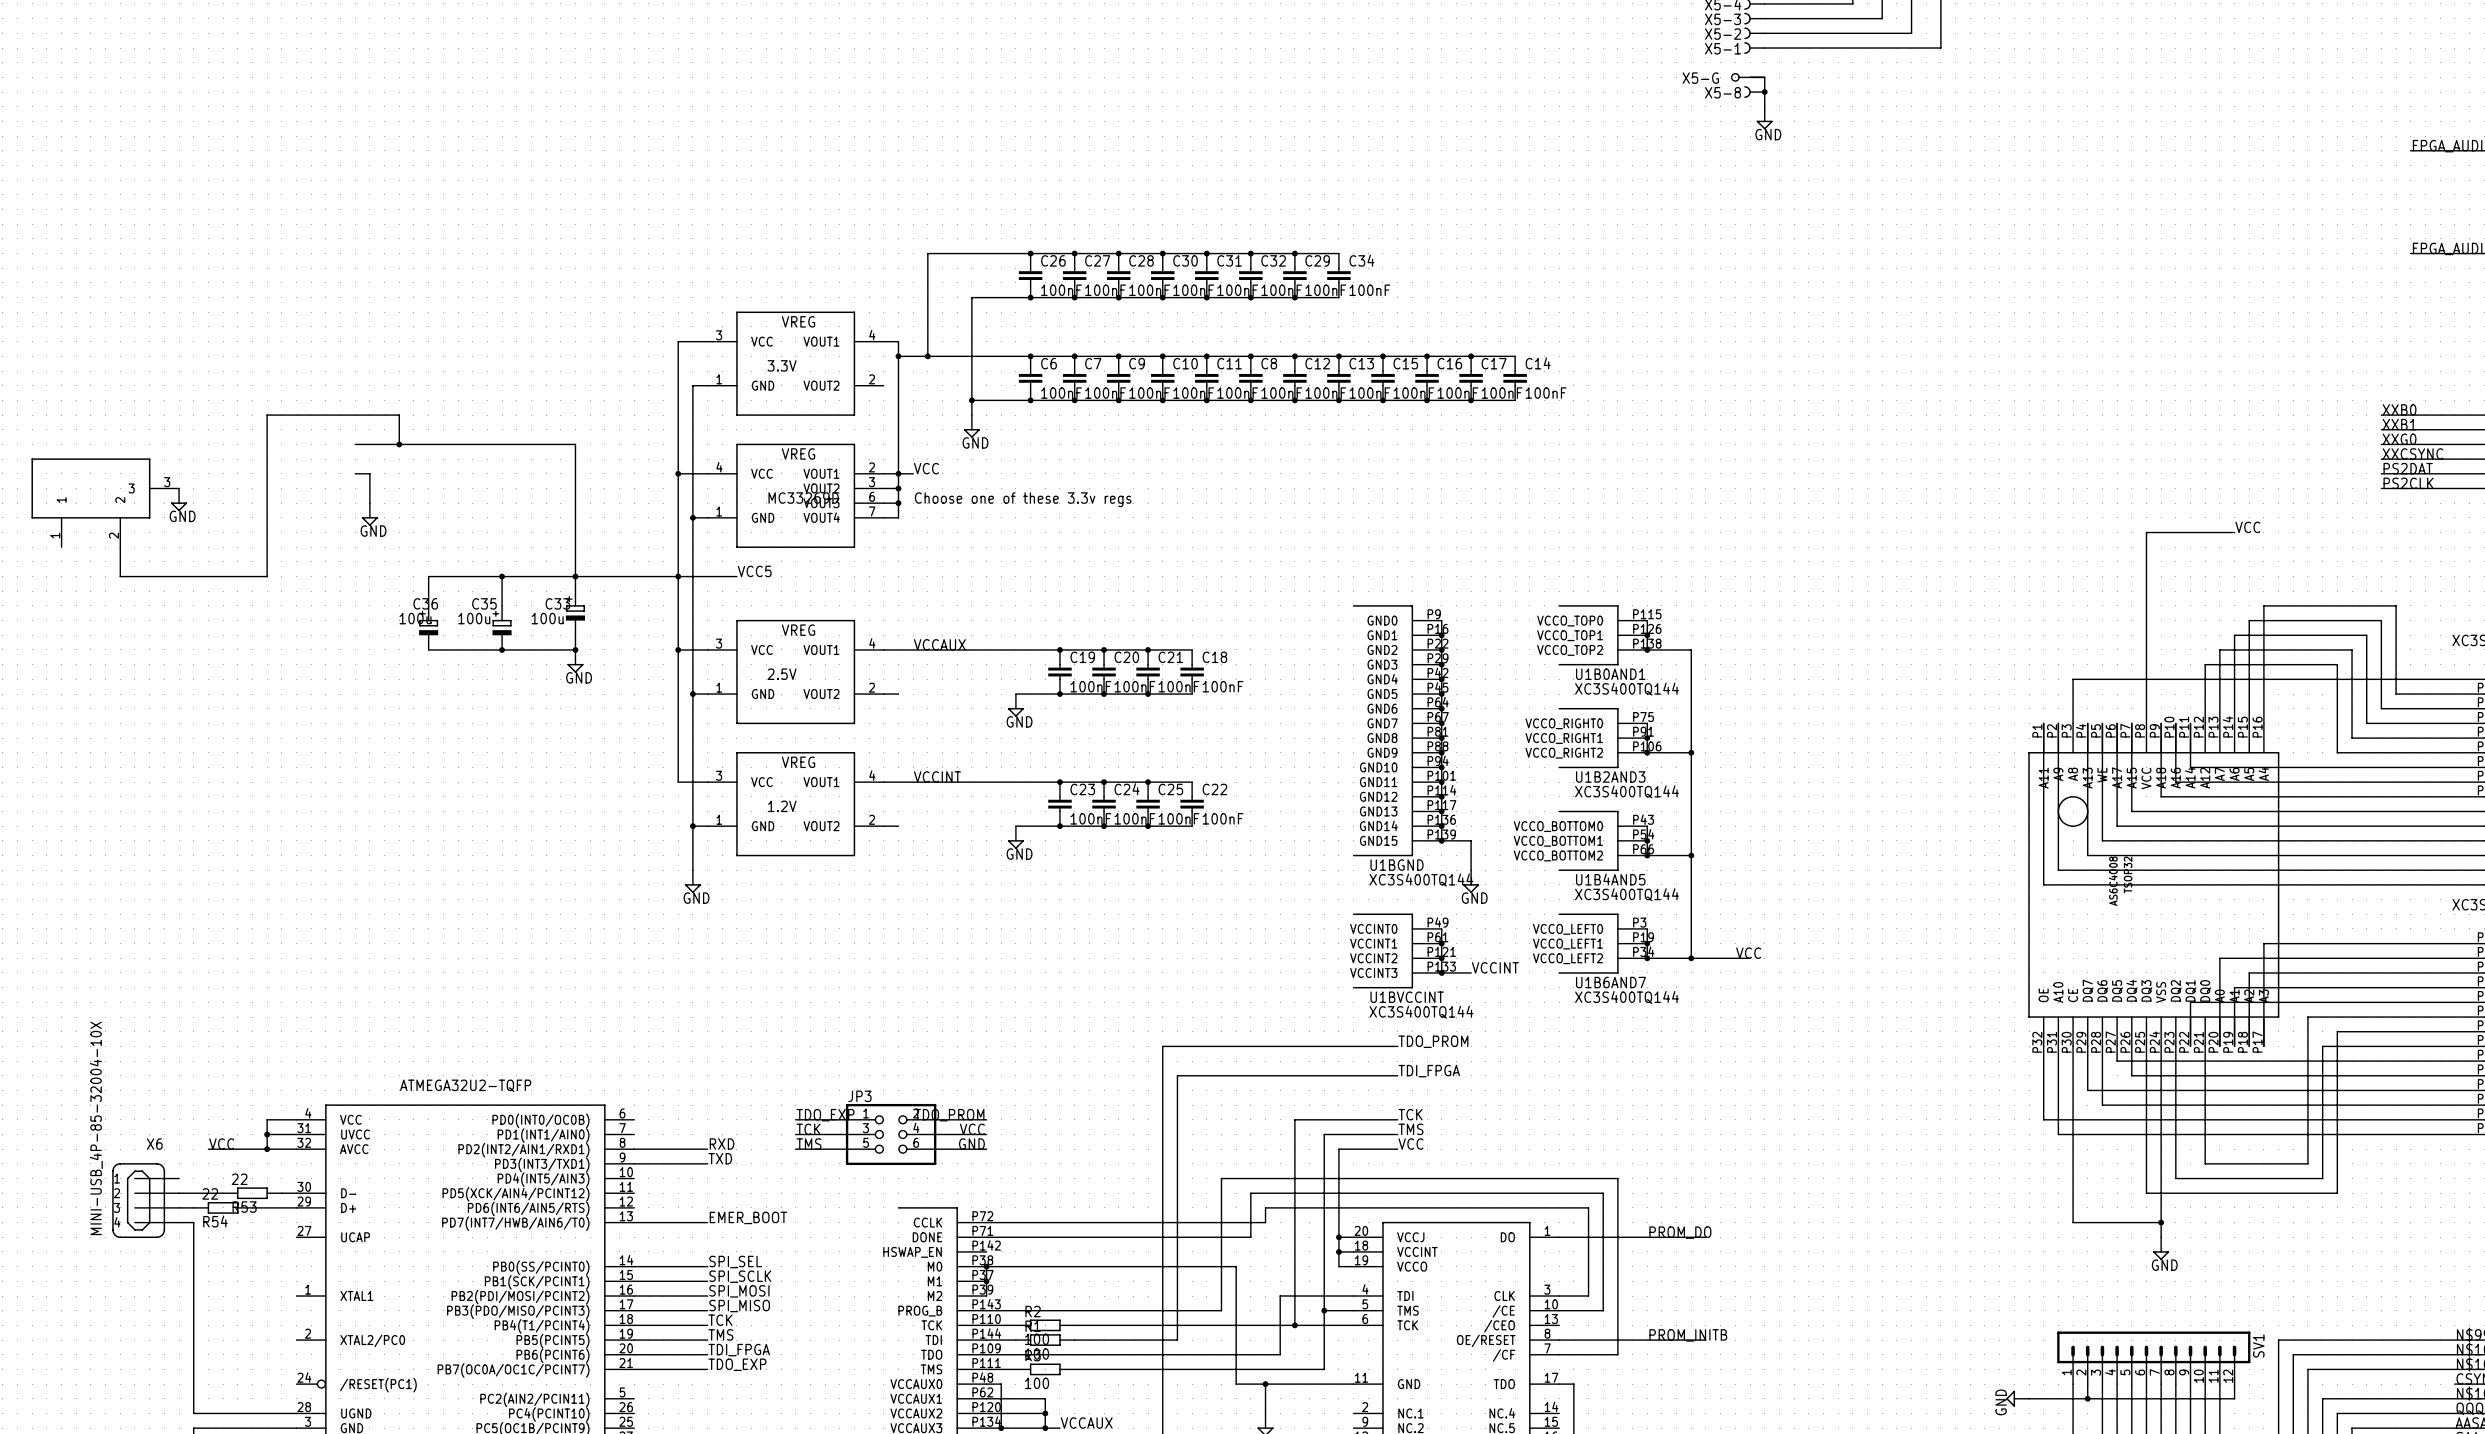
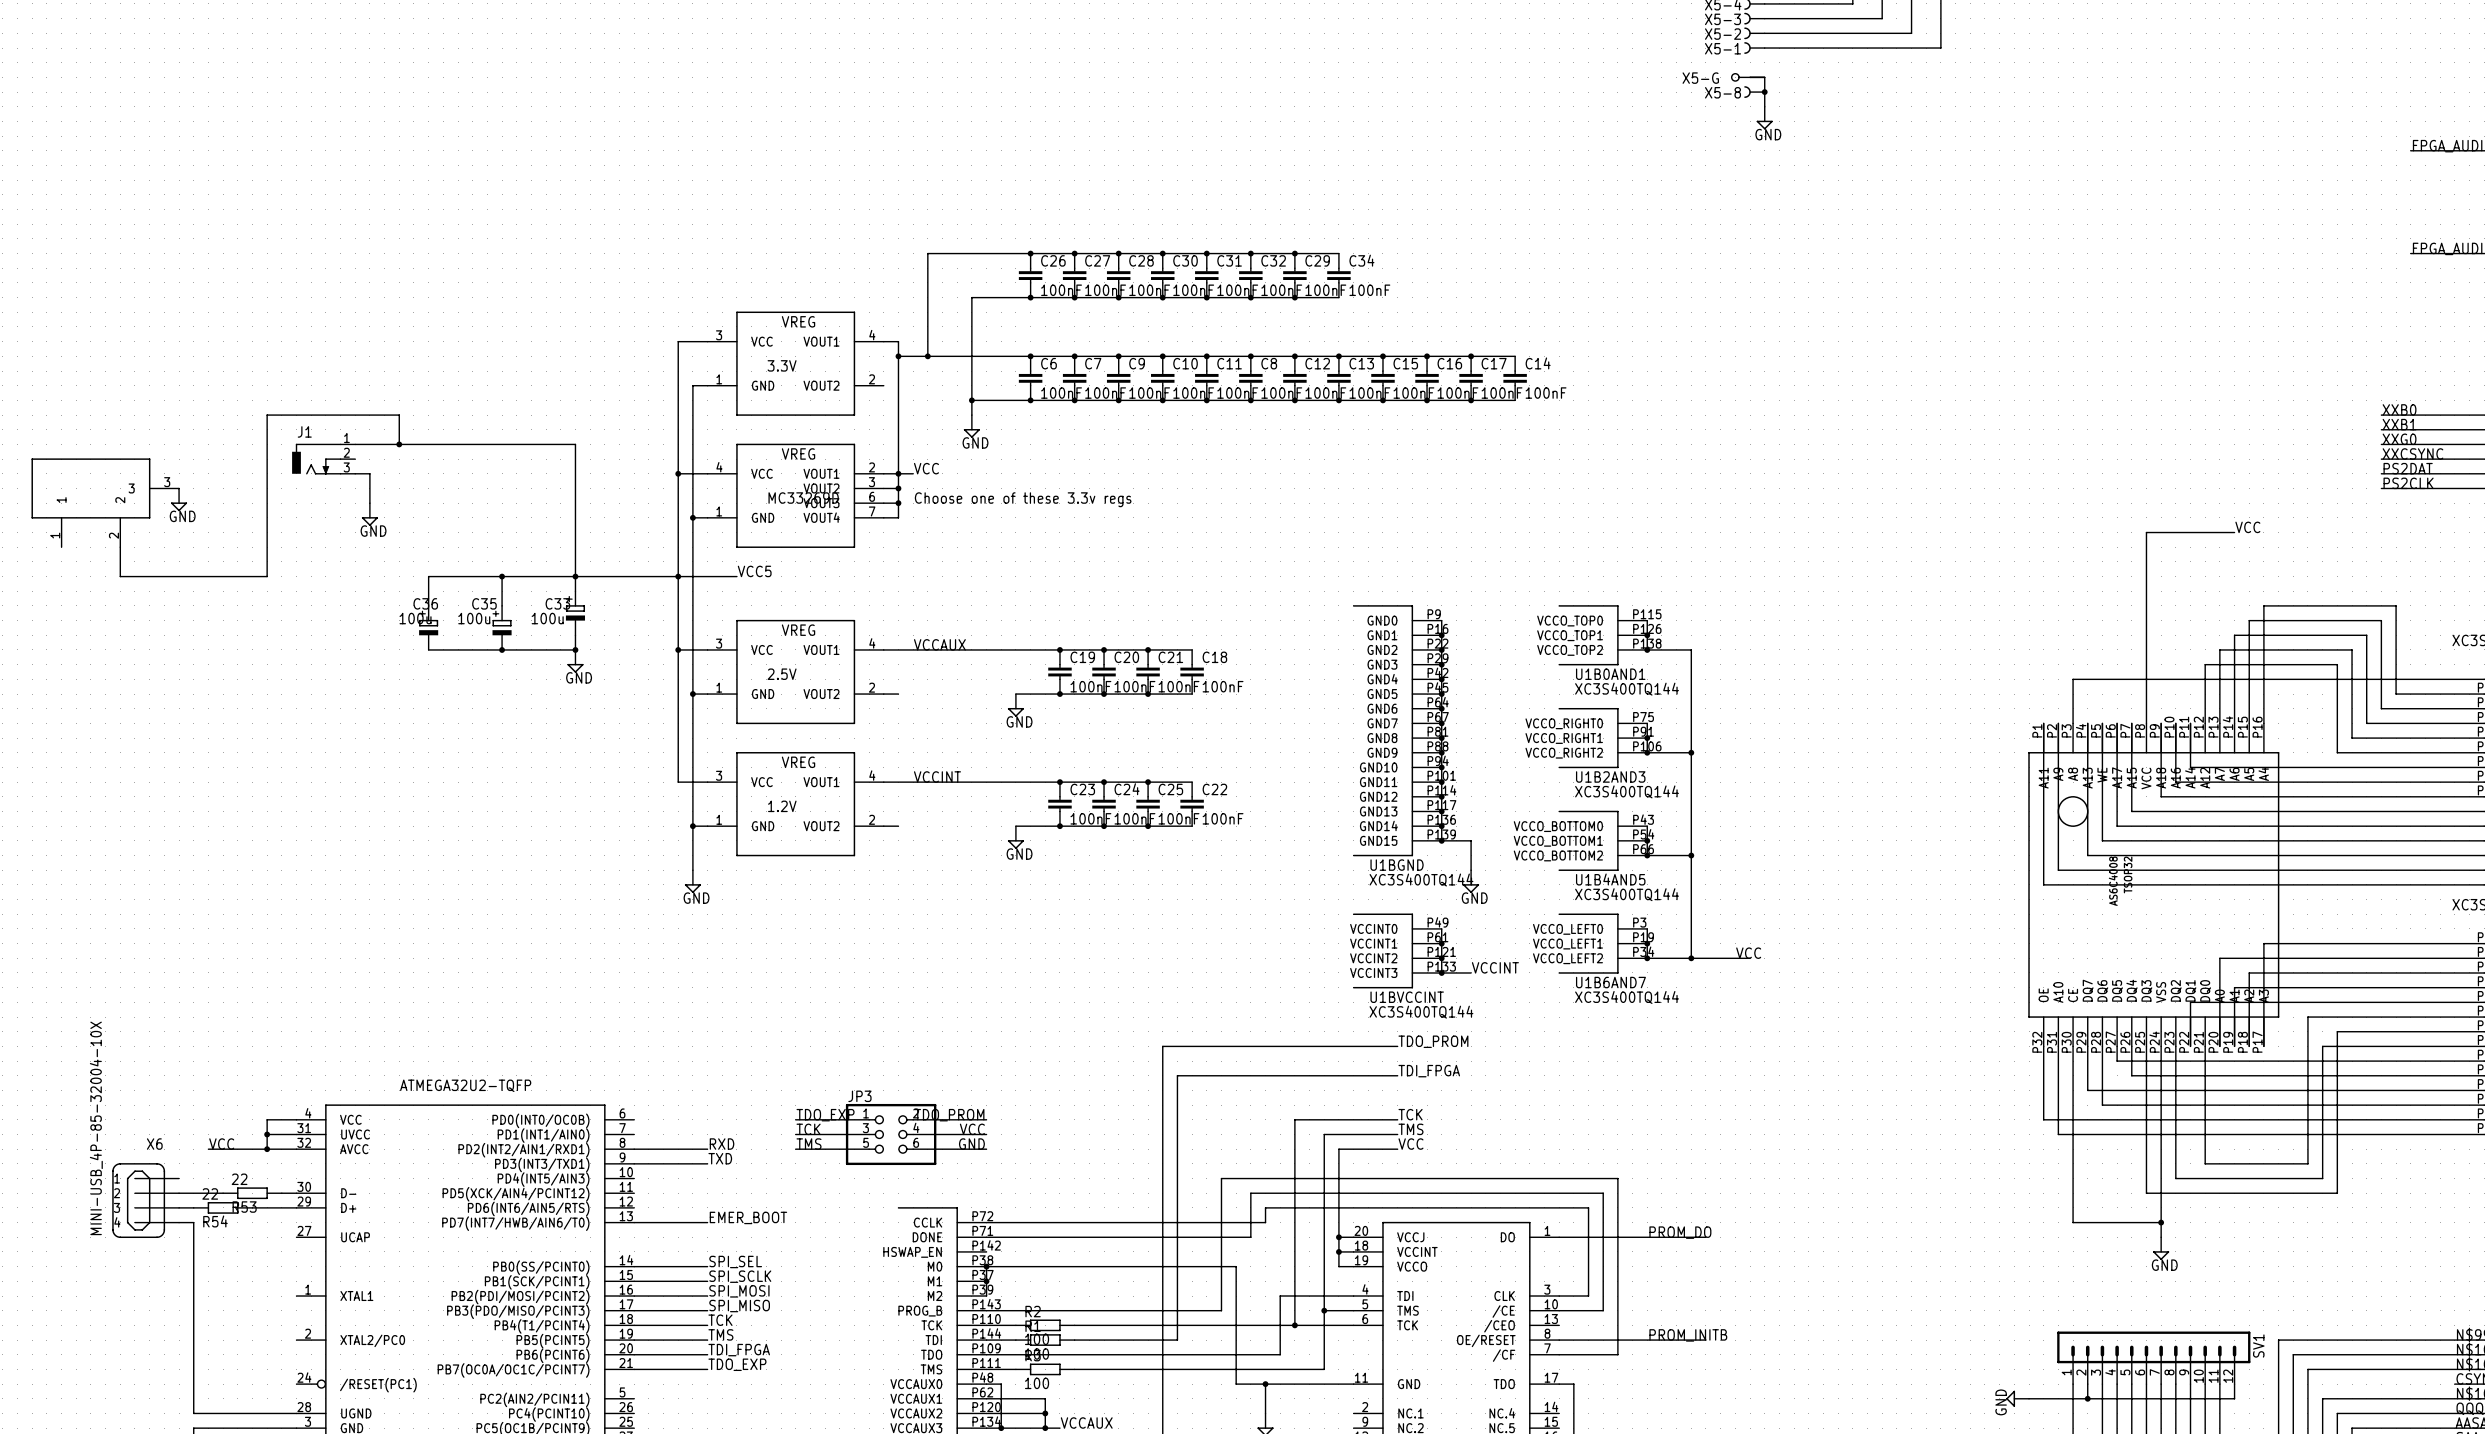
J1: none -> (323, 459)

